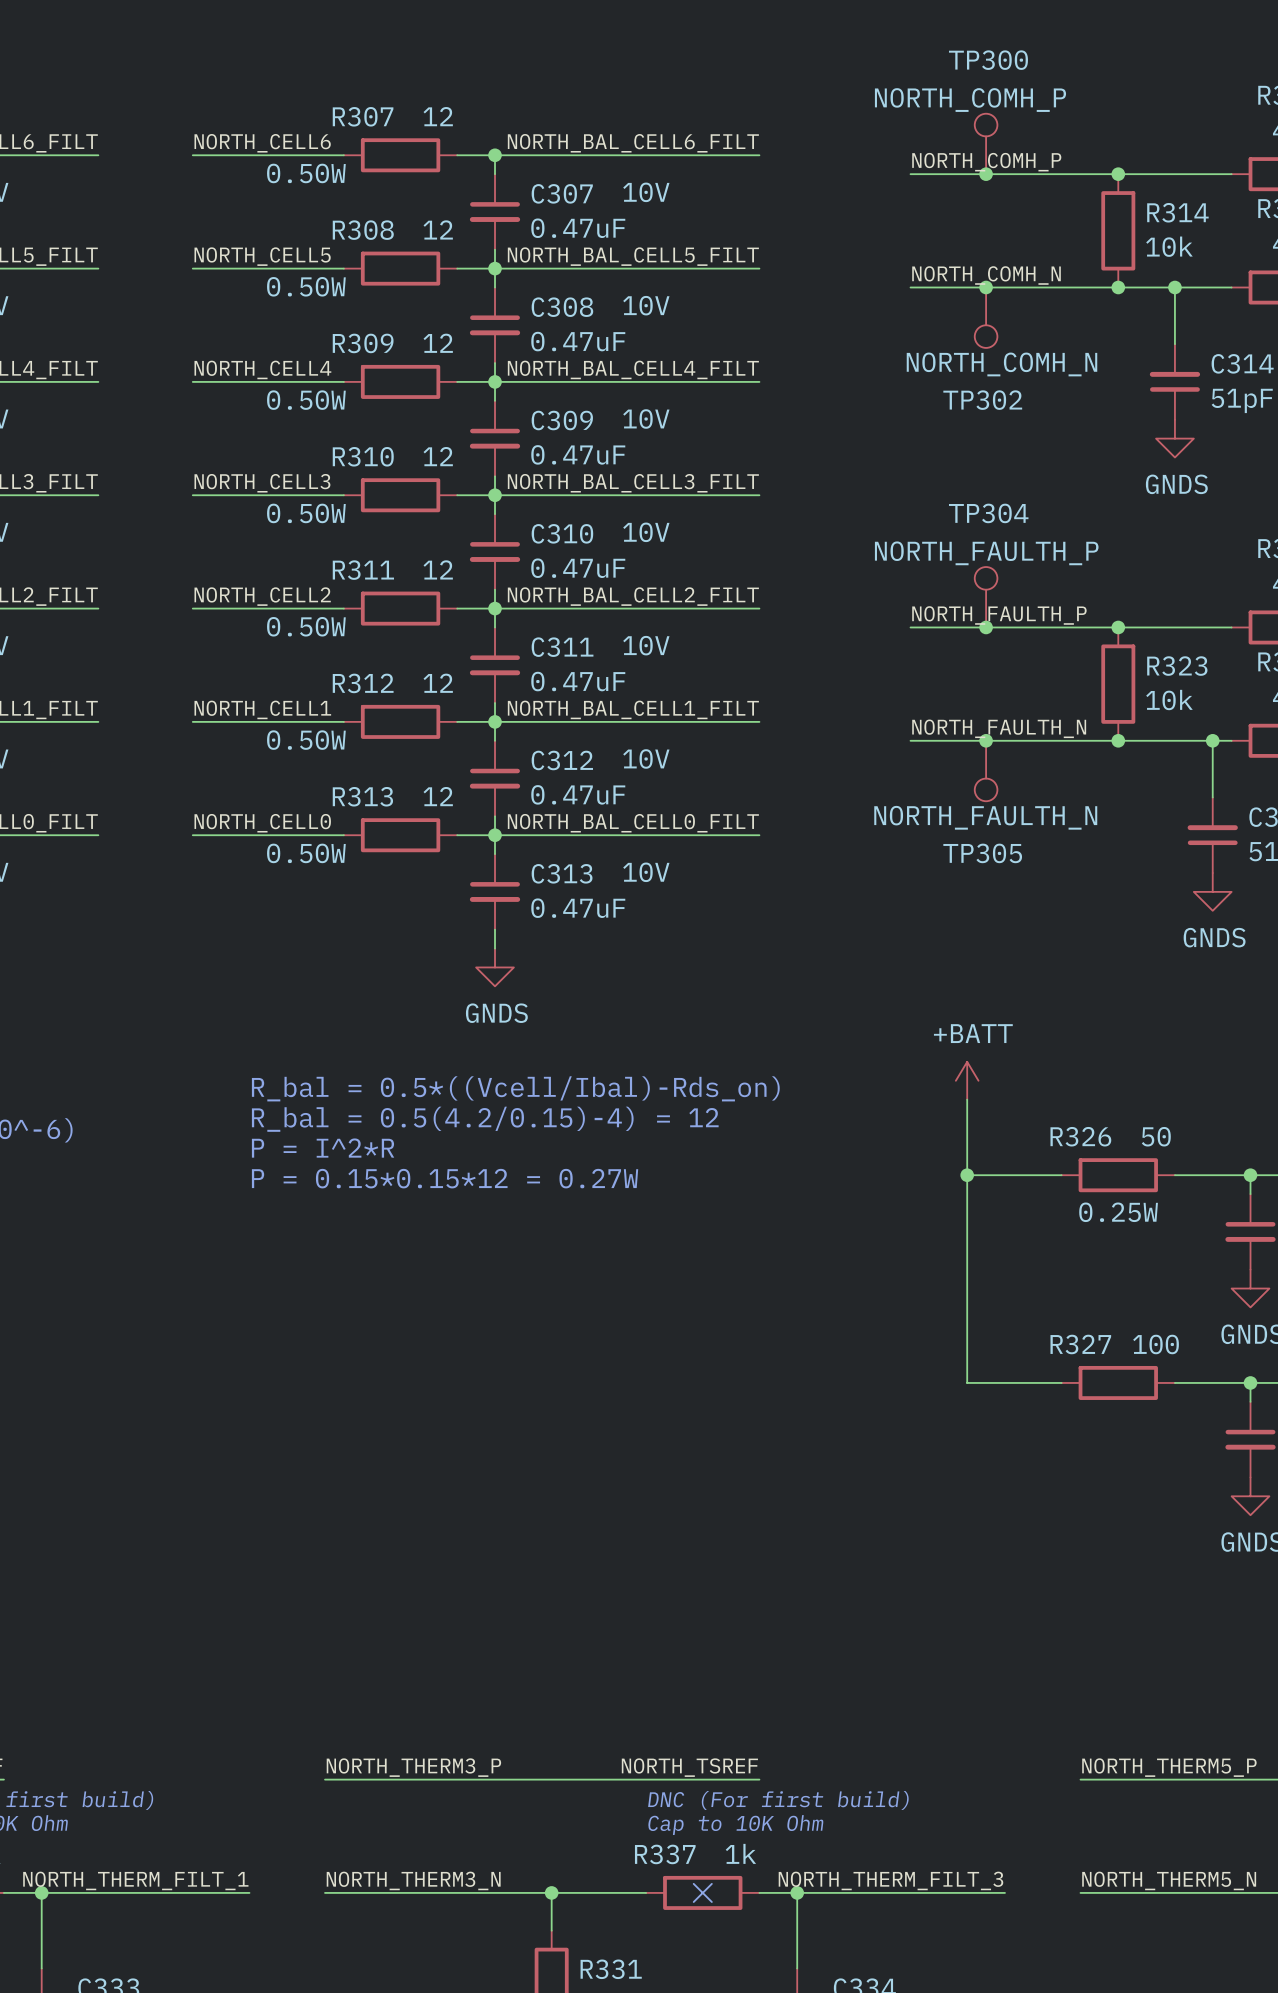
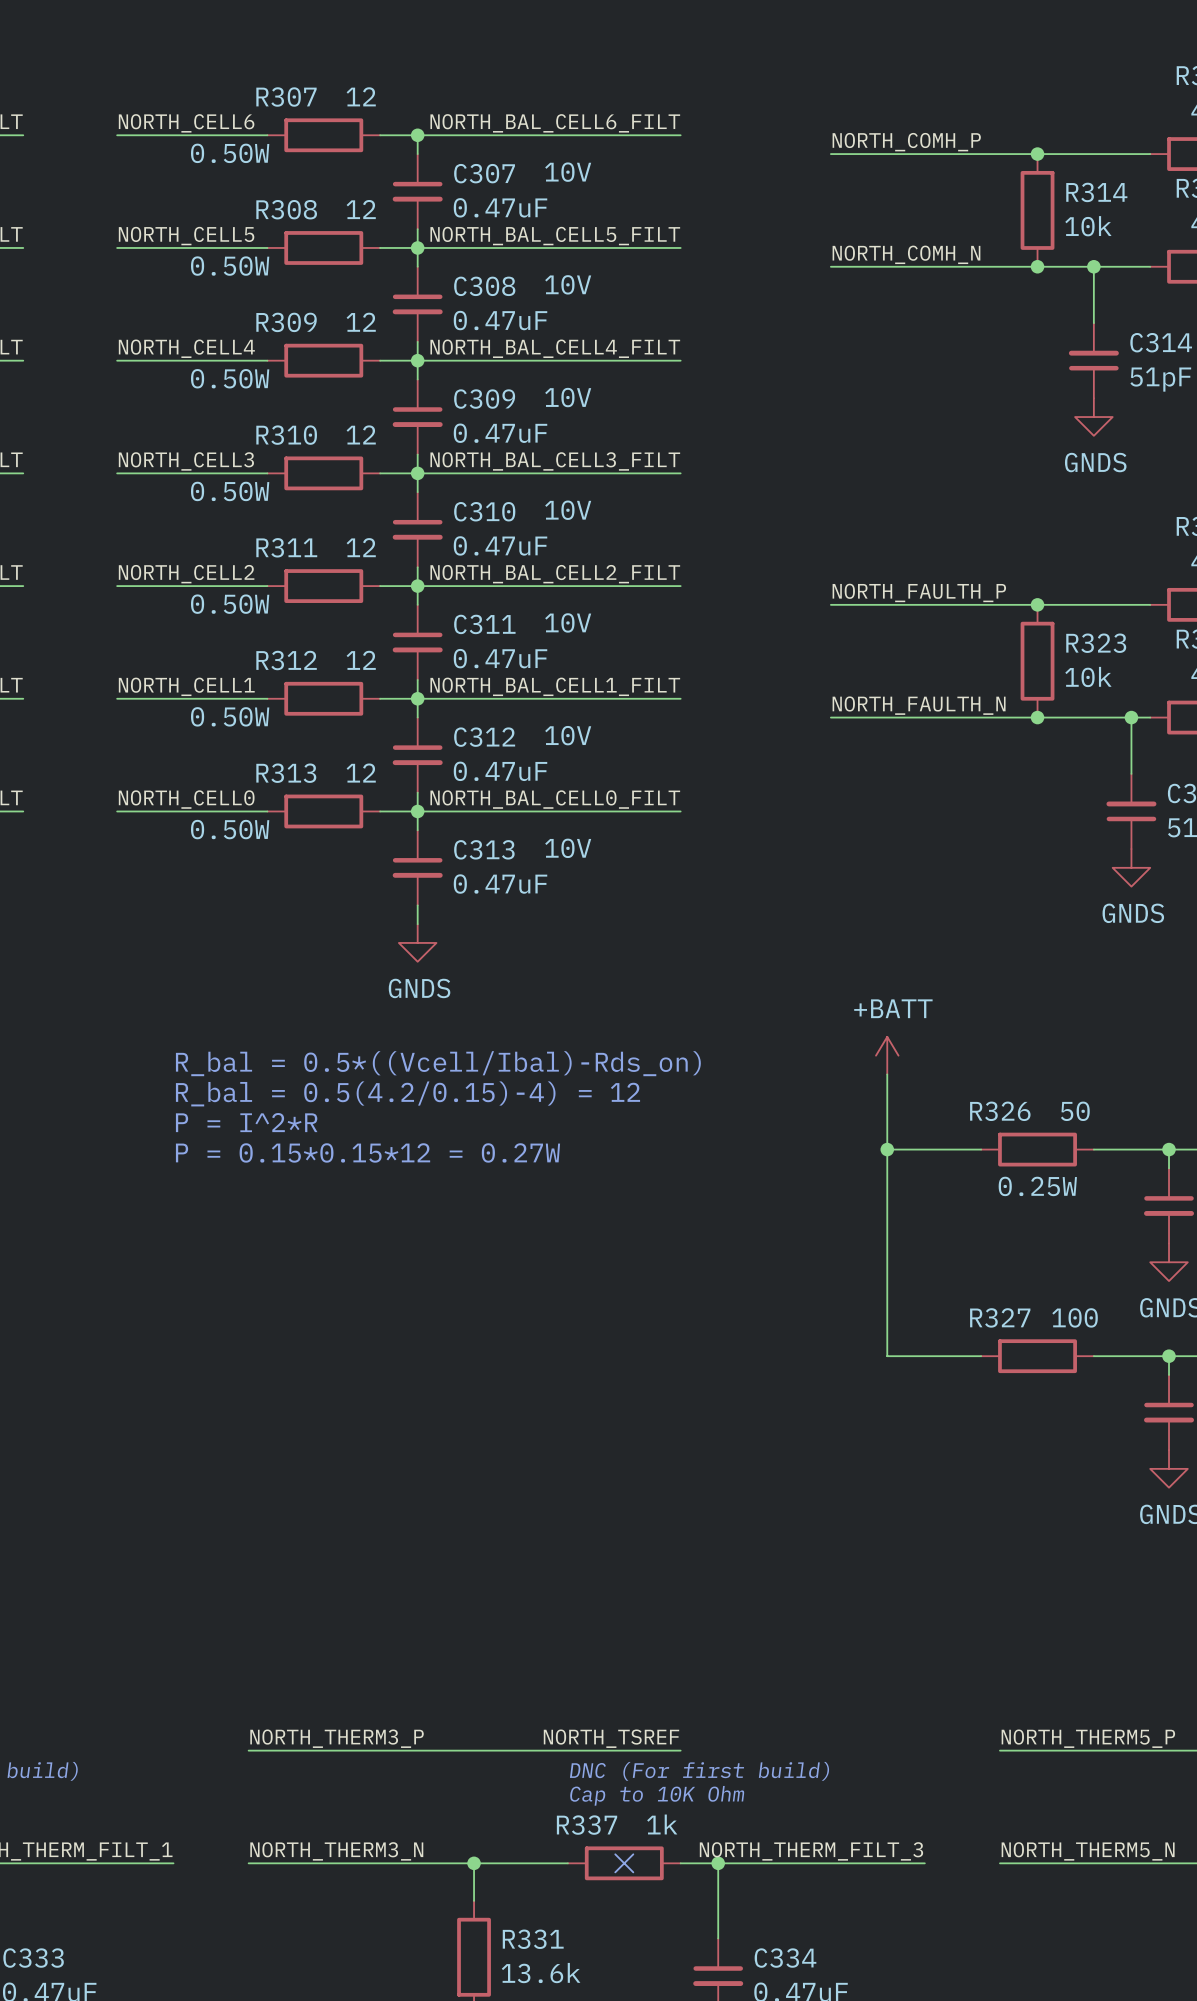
TP300: NORTH_COMH_P (986, 143) -> none
junction: (986, 174) -> none
junction: (986, 287) -> none
TP302: NORTH_COMH_N (986, 317) -> none
TP304: NORTH_FAULTH_P (986, 597) -> none
junction: (986, 627) -> none
junction: (986, 740) -> none
TP305: NORTH_FAULTH_N (986, 771) -> none

